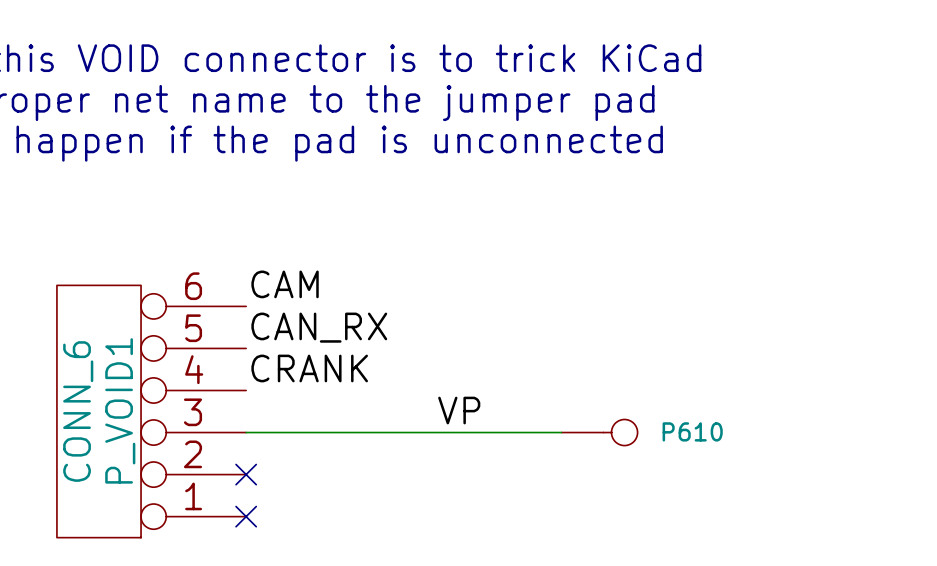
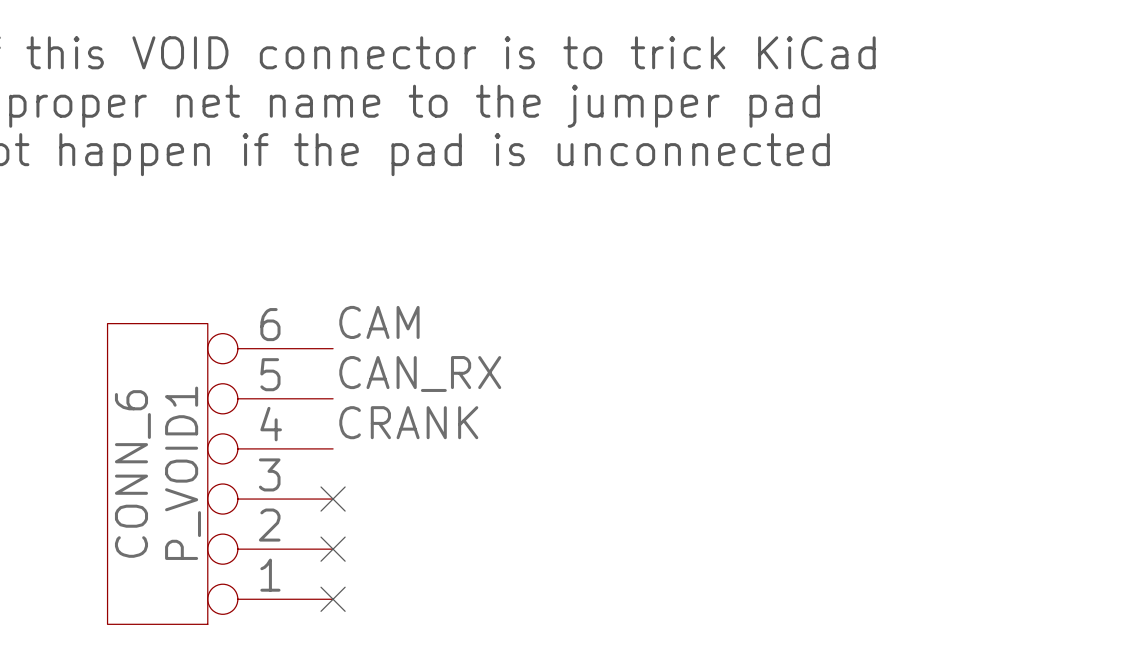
label: VP (459, 410) -> none
wire: (246, 432) (561, 432) -> none
no-connect mark: none -> (333, 499)
P610: (599, 432) -> none

